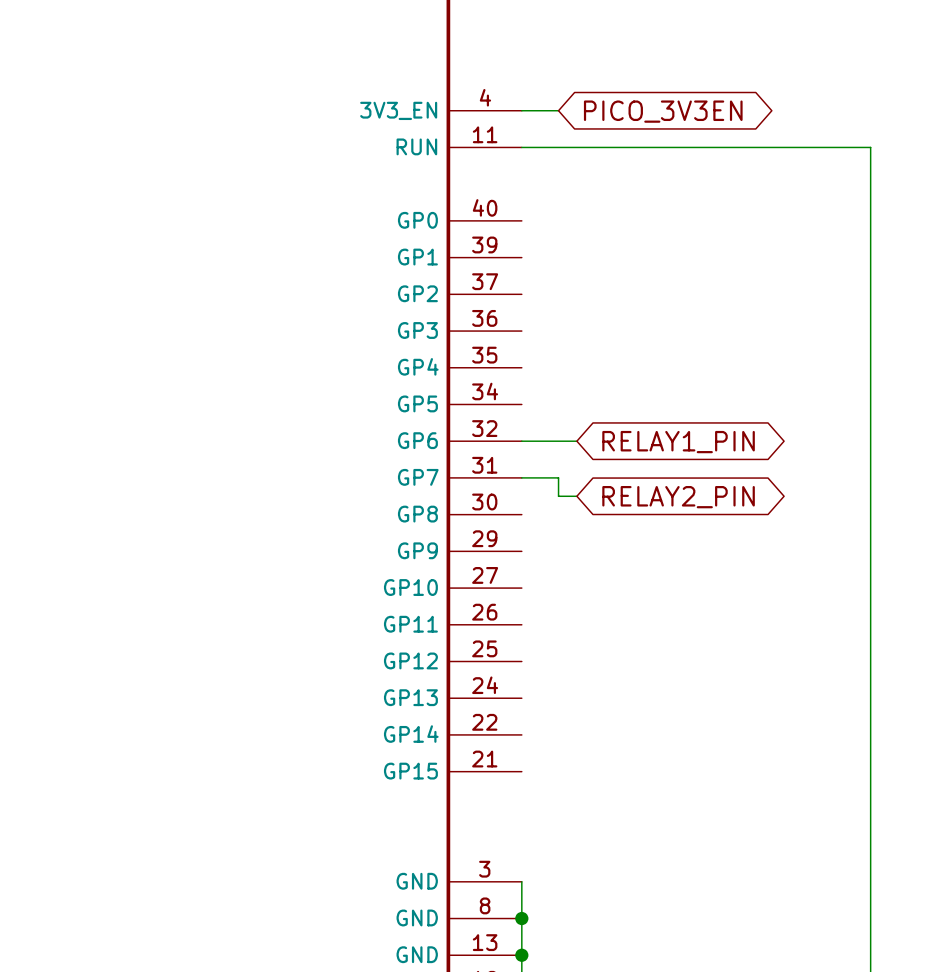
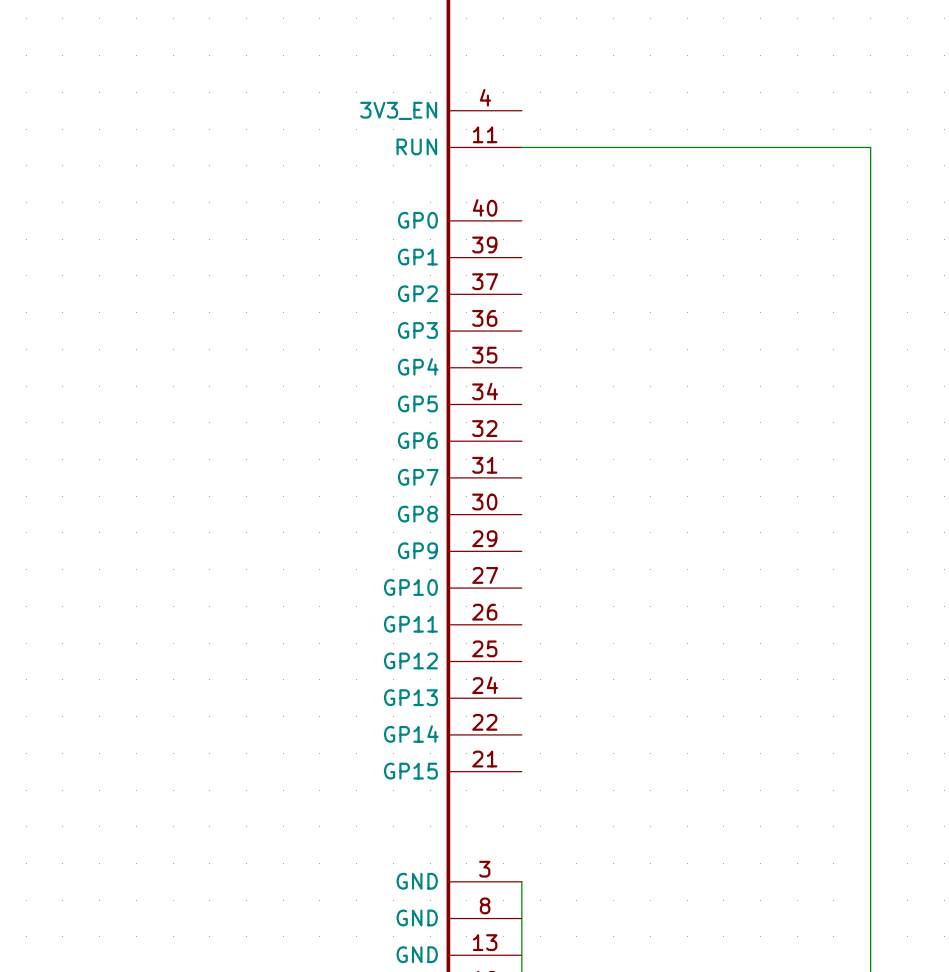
wire: (521, 110) (558, 110) -> none
global label: PICO_3V3EN (663, 111) -> none
wire: (521, 441) (576, 441) -> none
global label: RELAY1_PIN (678, 442) -> none
wire: (521, 477) (558, 477) (558, 496) (576, 496) -> none
global label: RELAY2_PIN (678, 497) -> none
junction: (521, 918) -> none
junction: (521, 955) -> none

